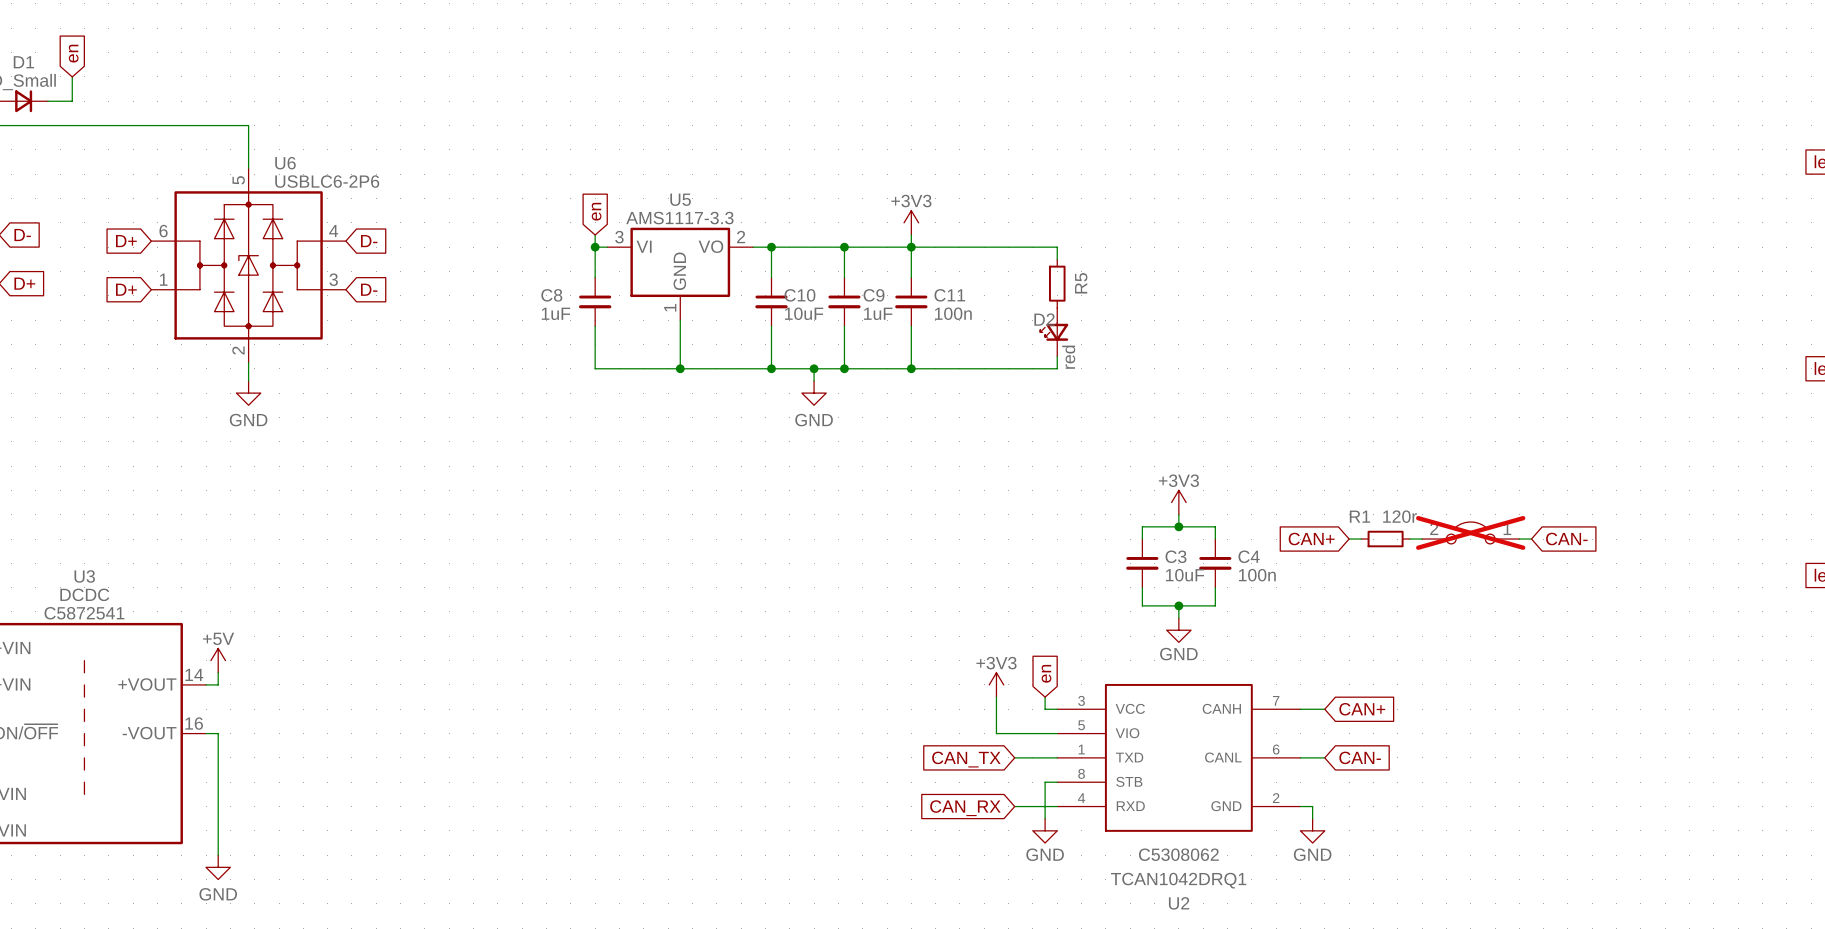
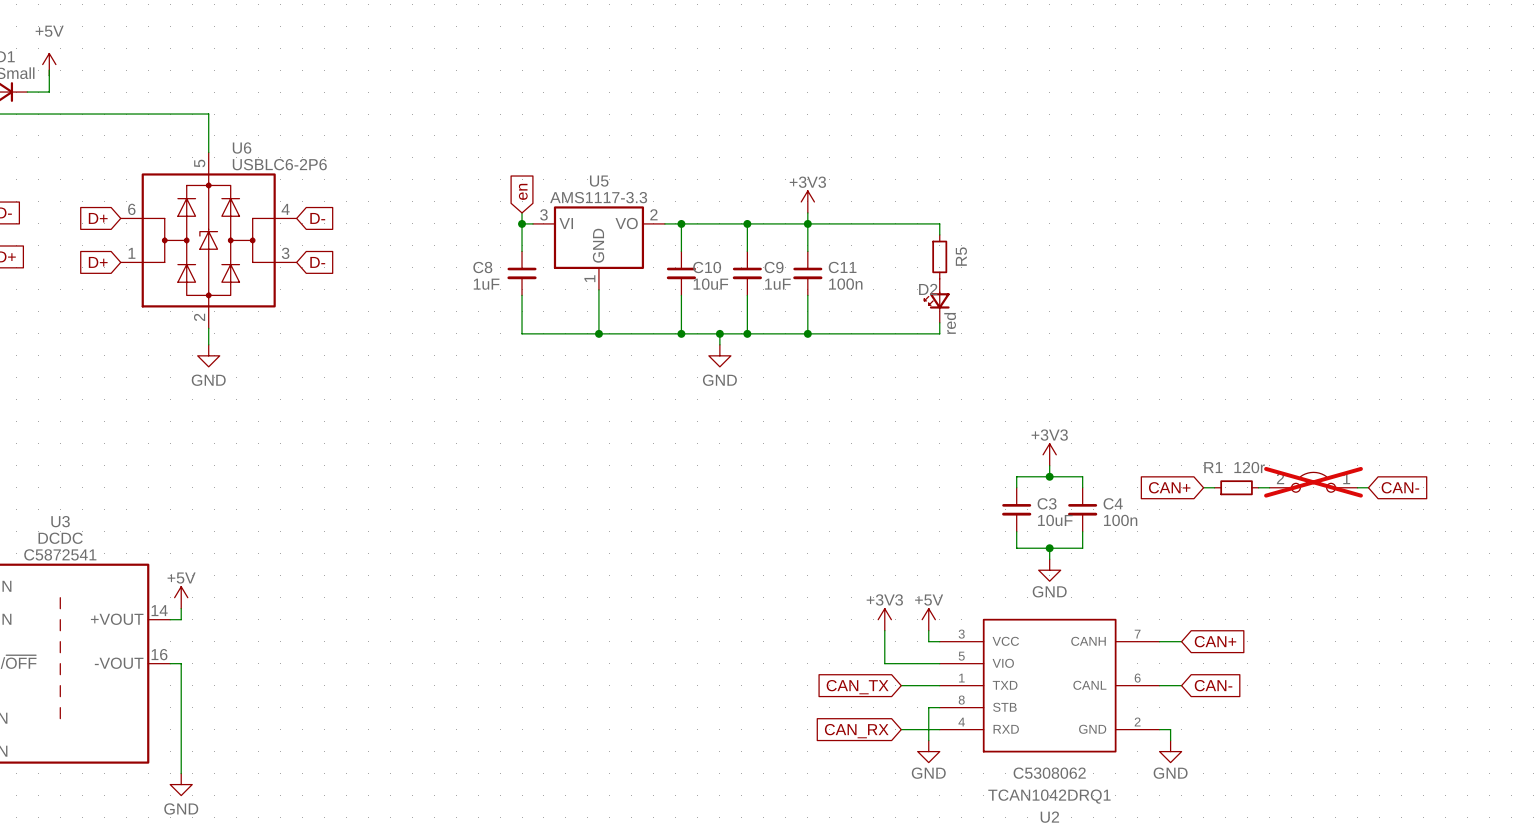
global label: en (73, 53) -> none
power symbol: none -> +5V (49, 64)
global label: en (1046, 673) -> none
power symbol: none -> +5V (928, 619)

